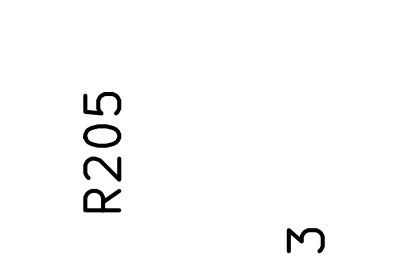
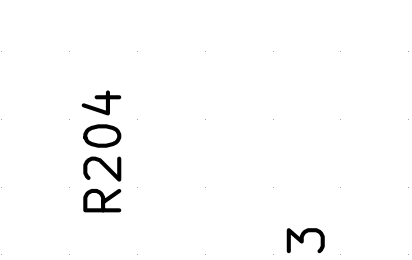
R205 name: R205 (102, 152) -> R204 (101, 151)

